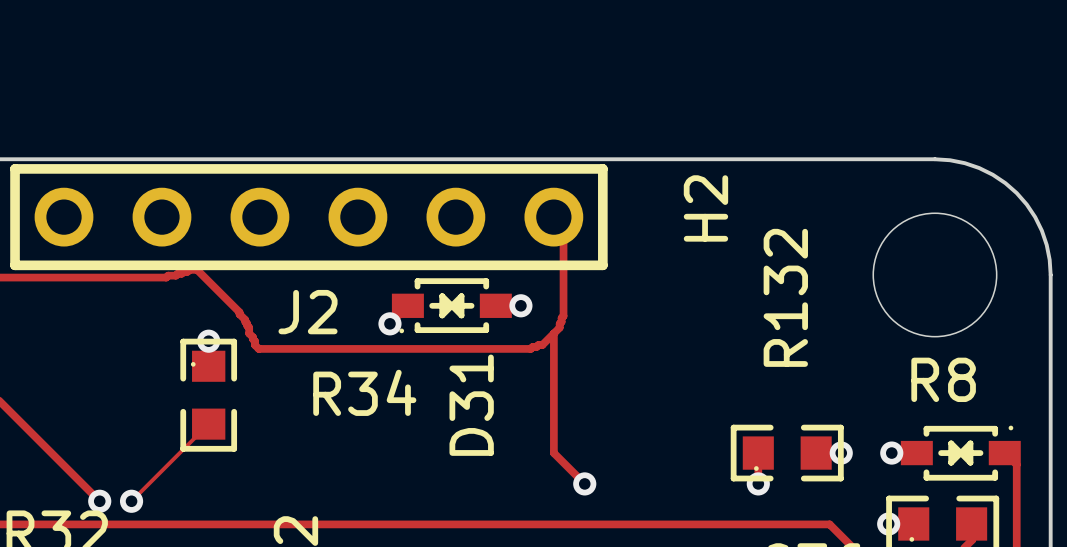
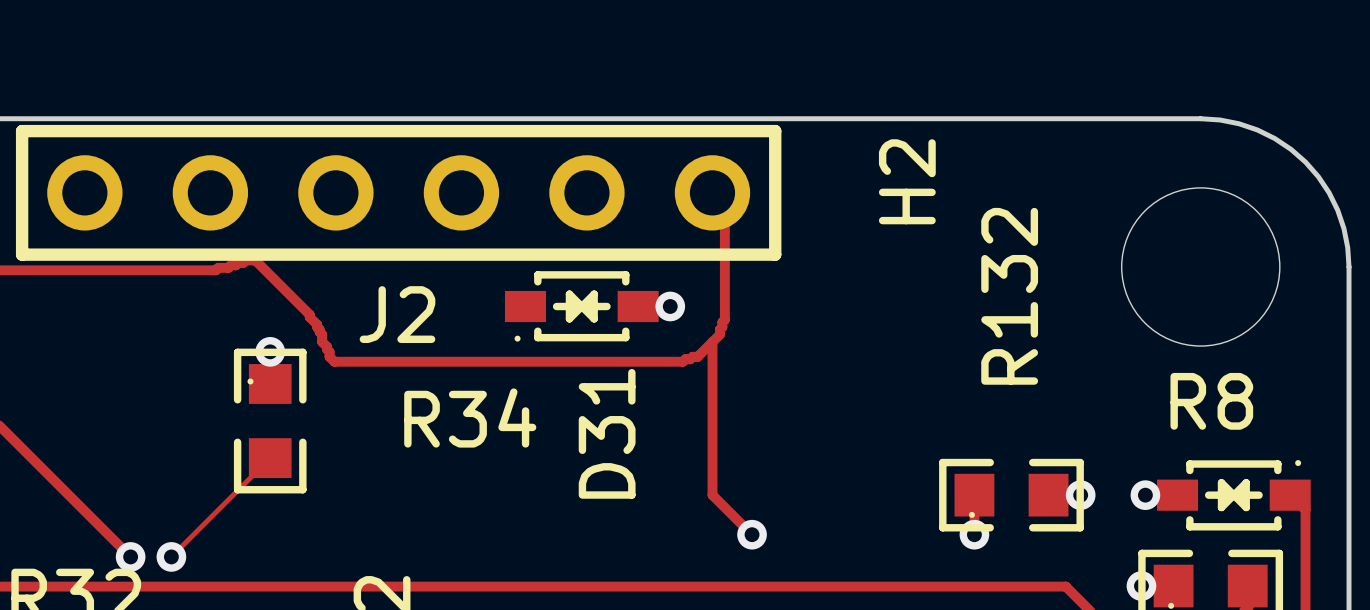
via: (389, 323) -> none

